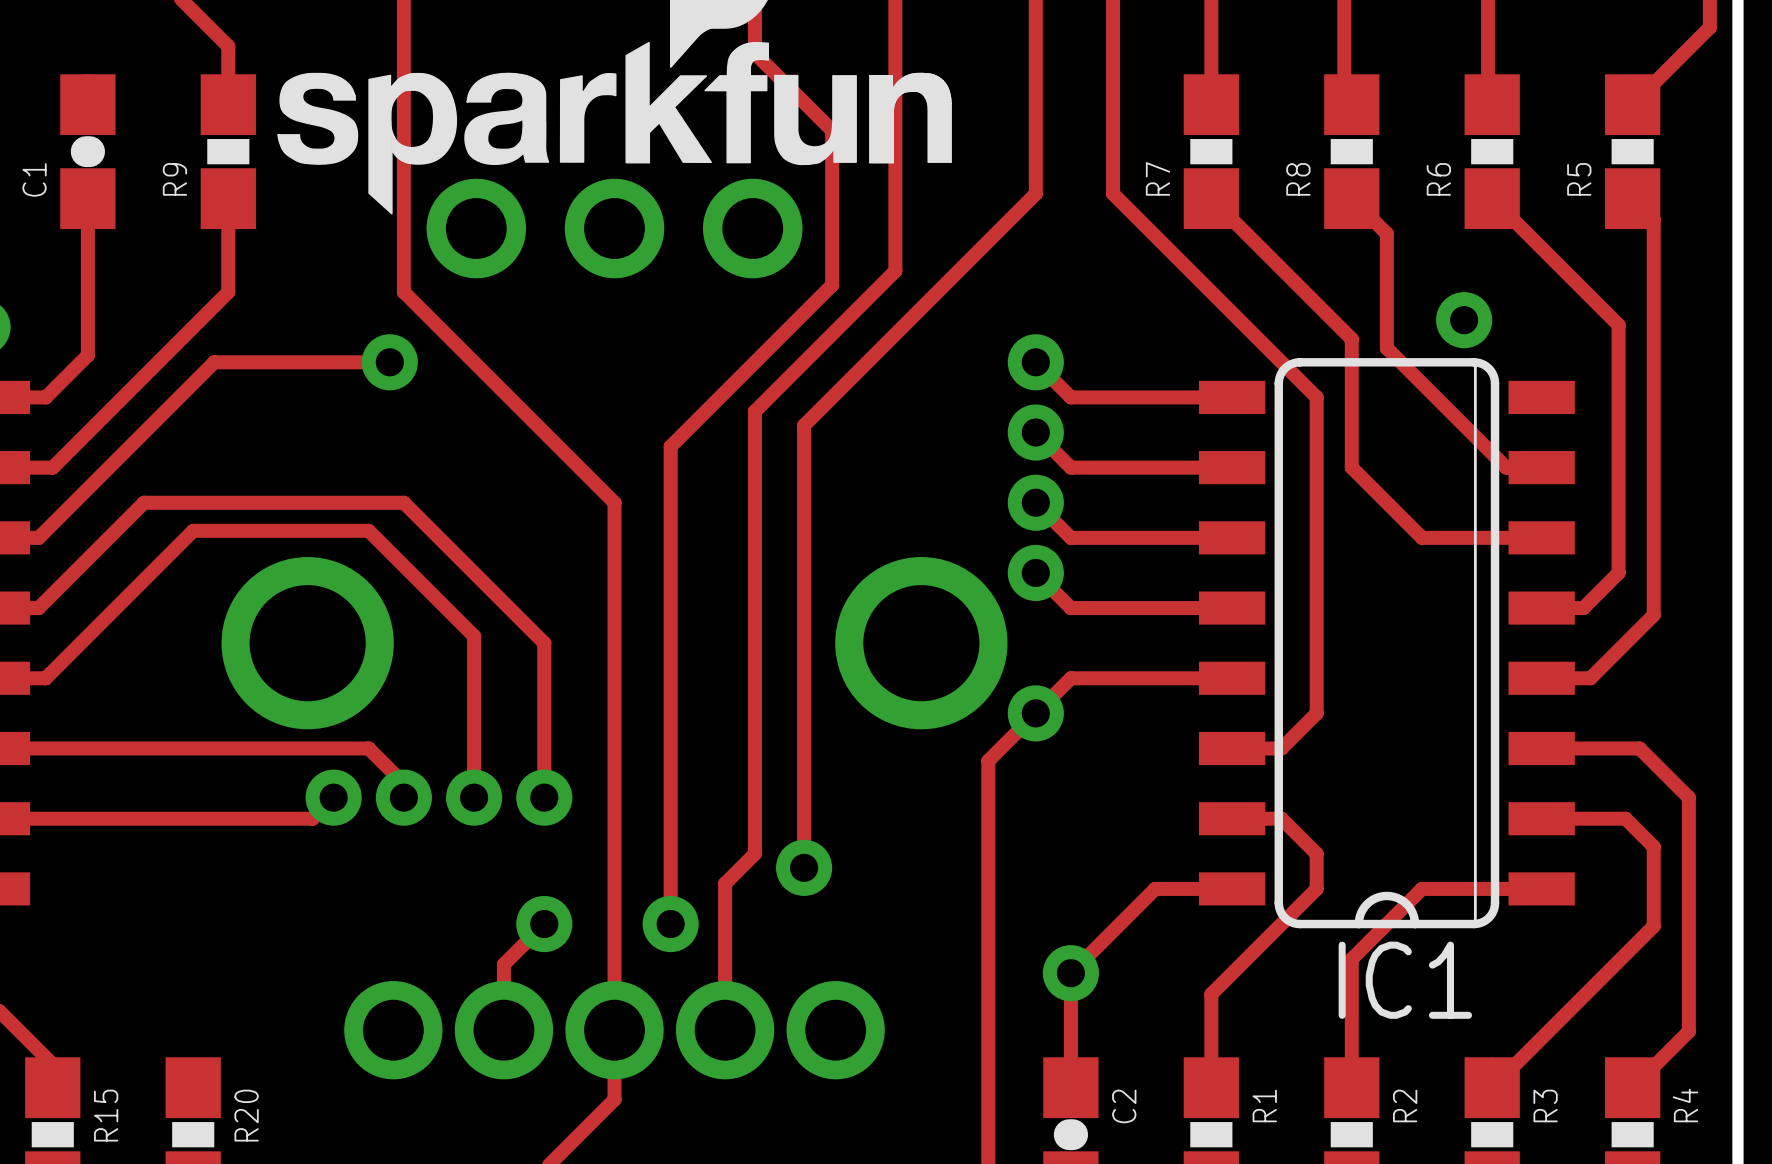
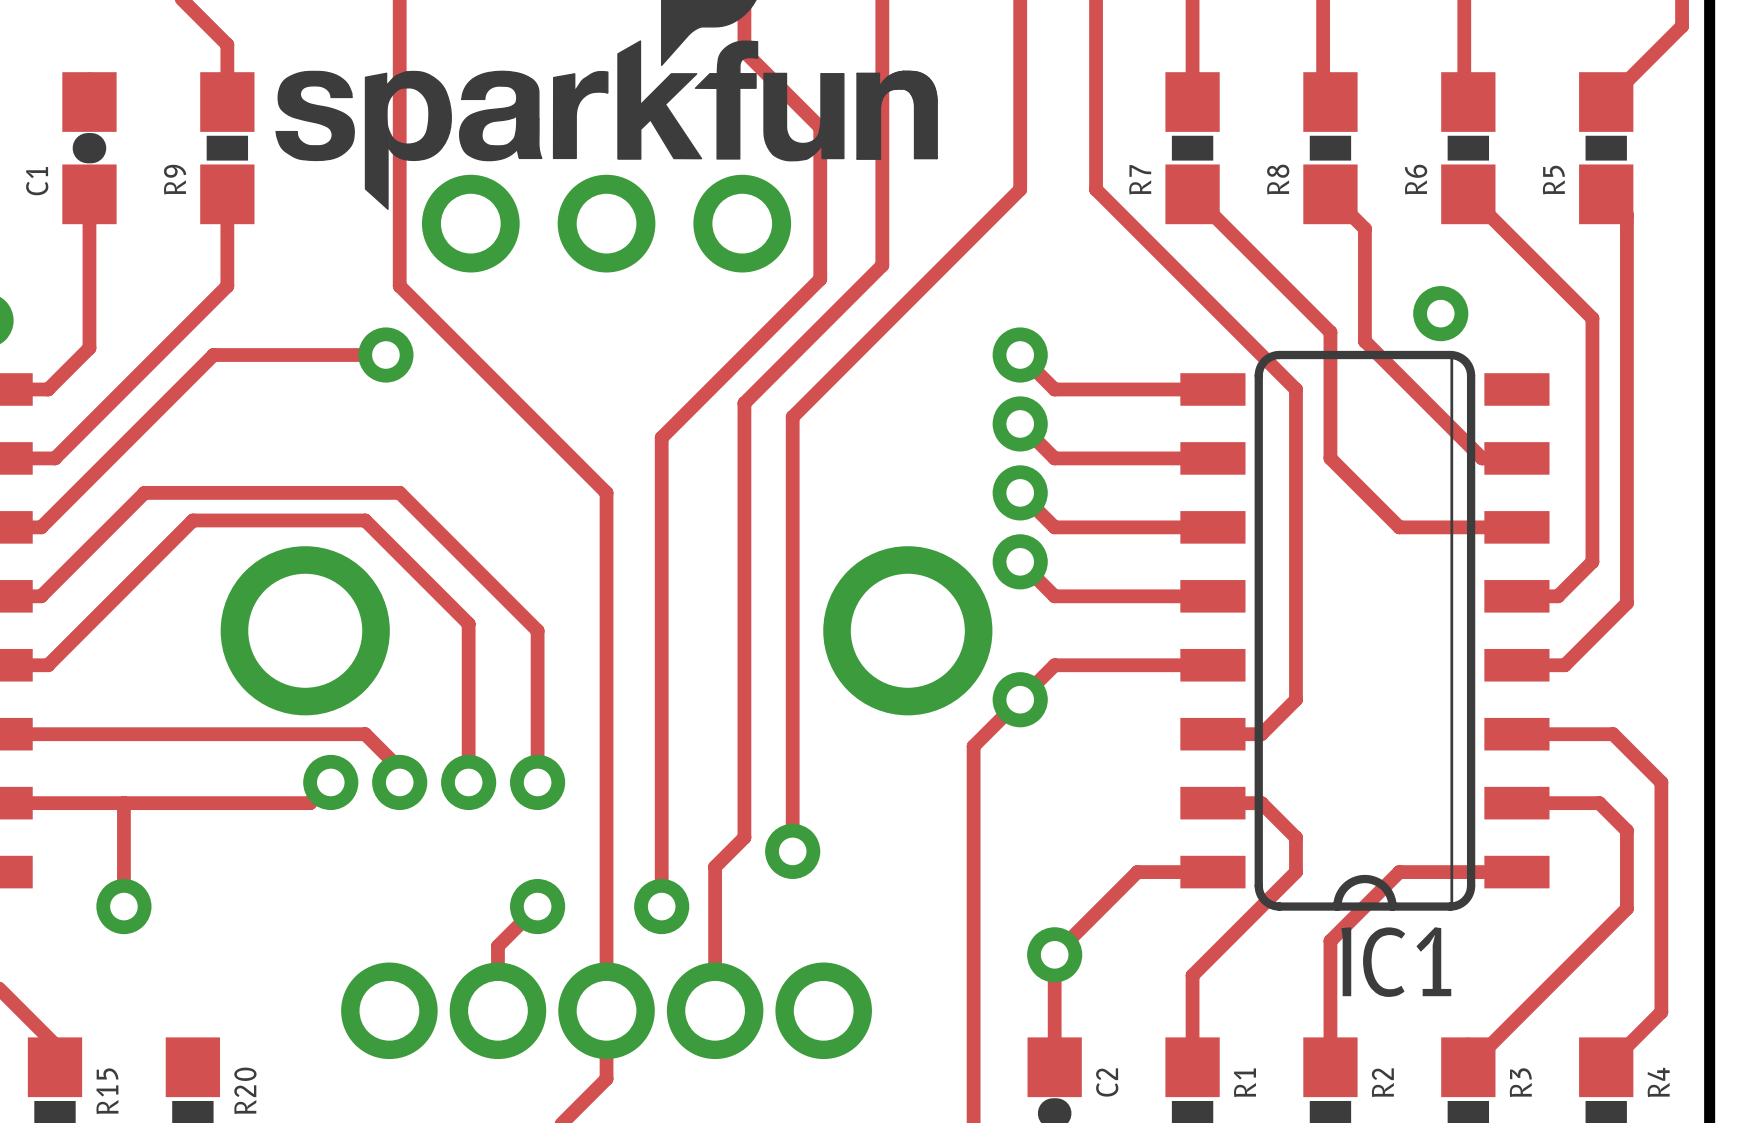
track: none -> (123, 803) (123, 906)
via: none -> (123, 906)

